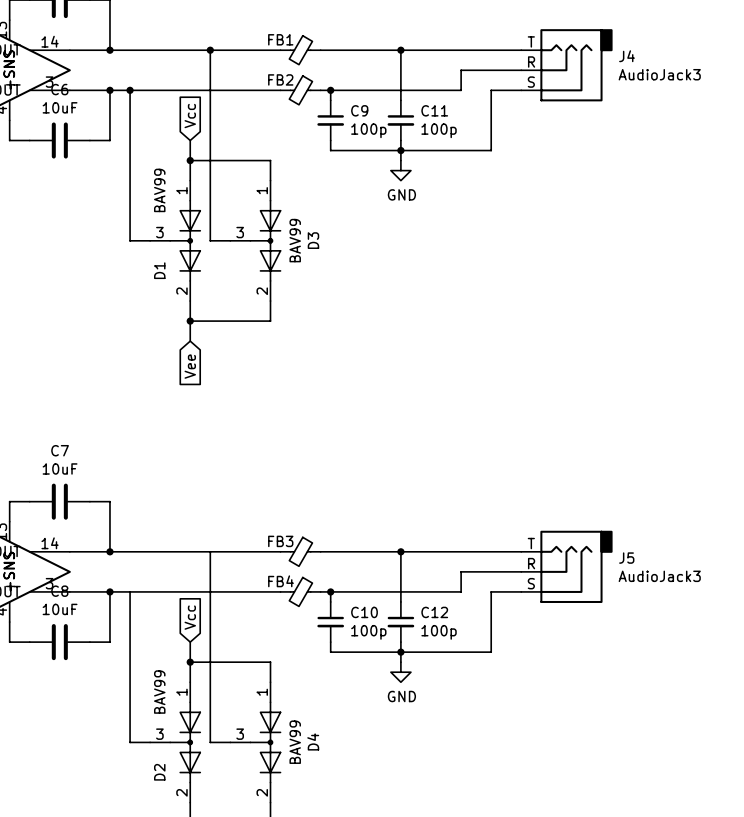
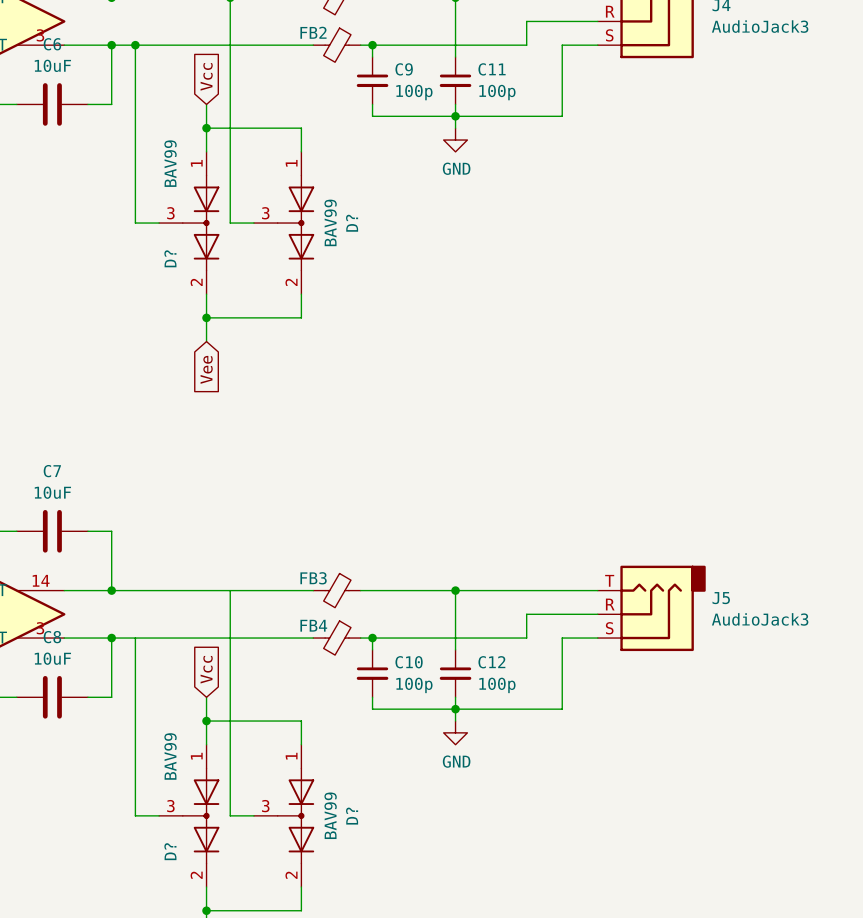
D3 name: D3 (313, 240) -> D? (352, 223)
D1 name: D1 (159, 270) -> D? (170, 258)
D4 name: D4 (313, 741) -> D? (352, 816)
D2 name: D2 (159, 772) -> D? (170, 851)

